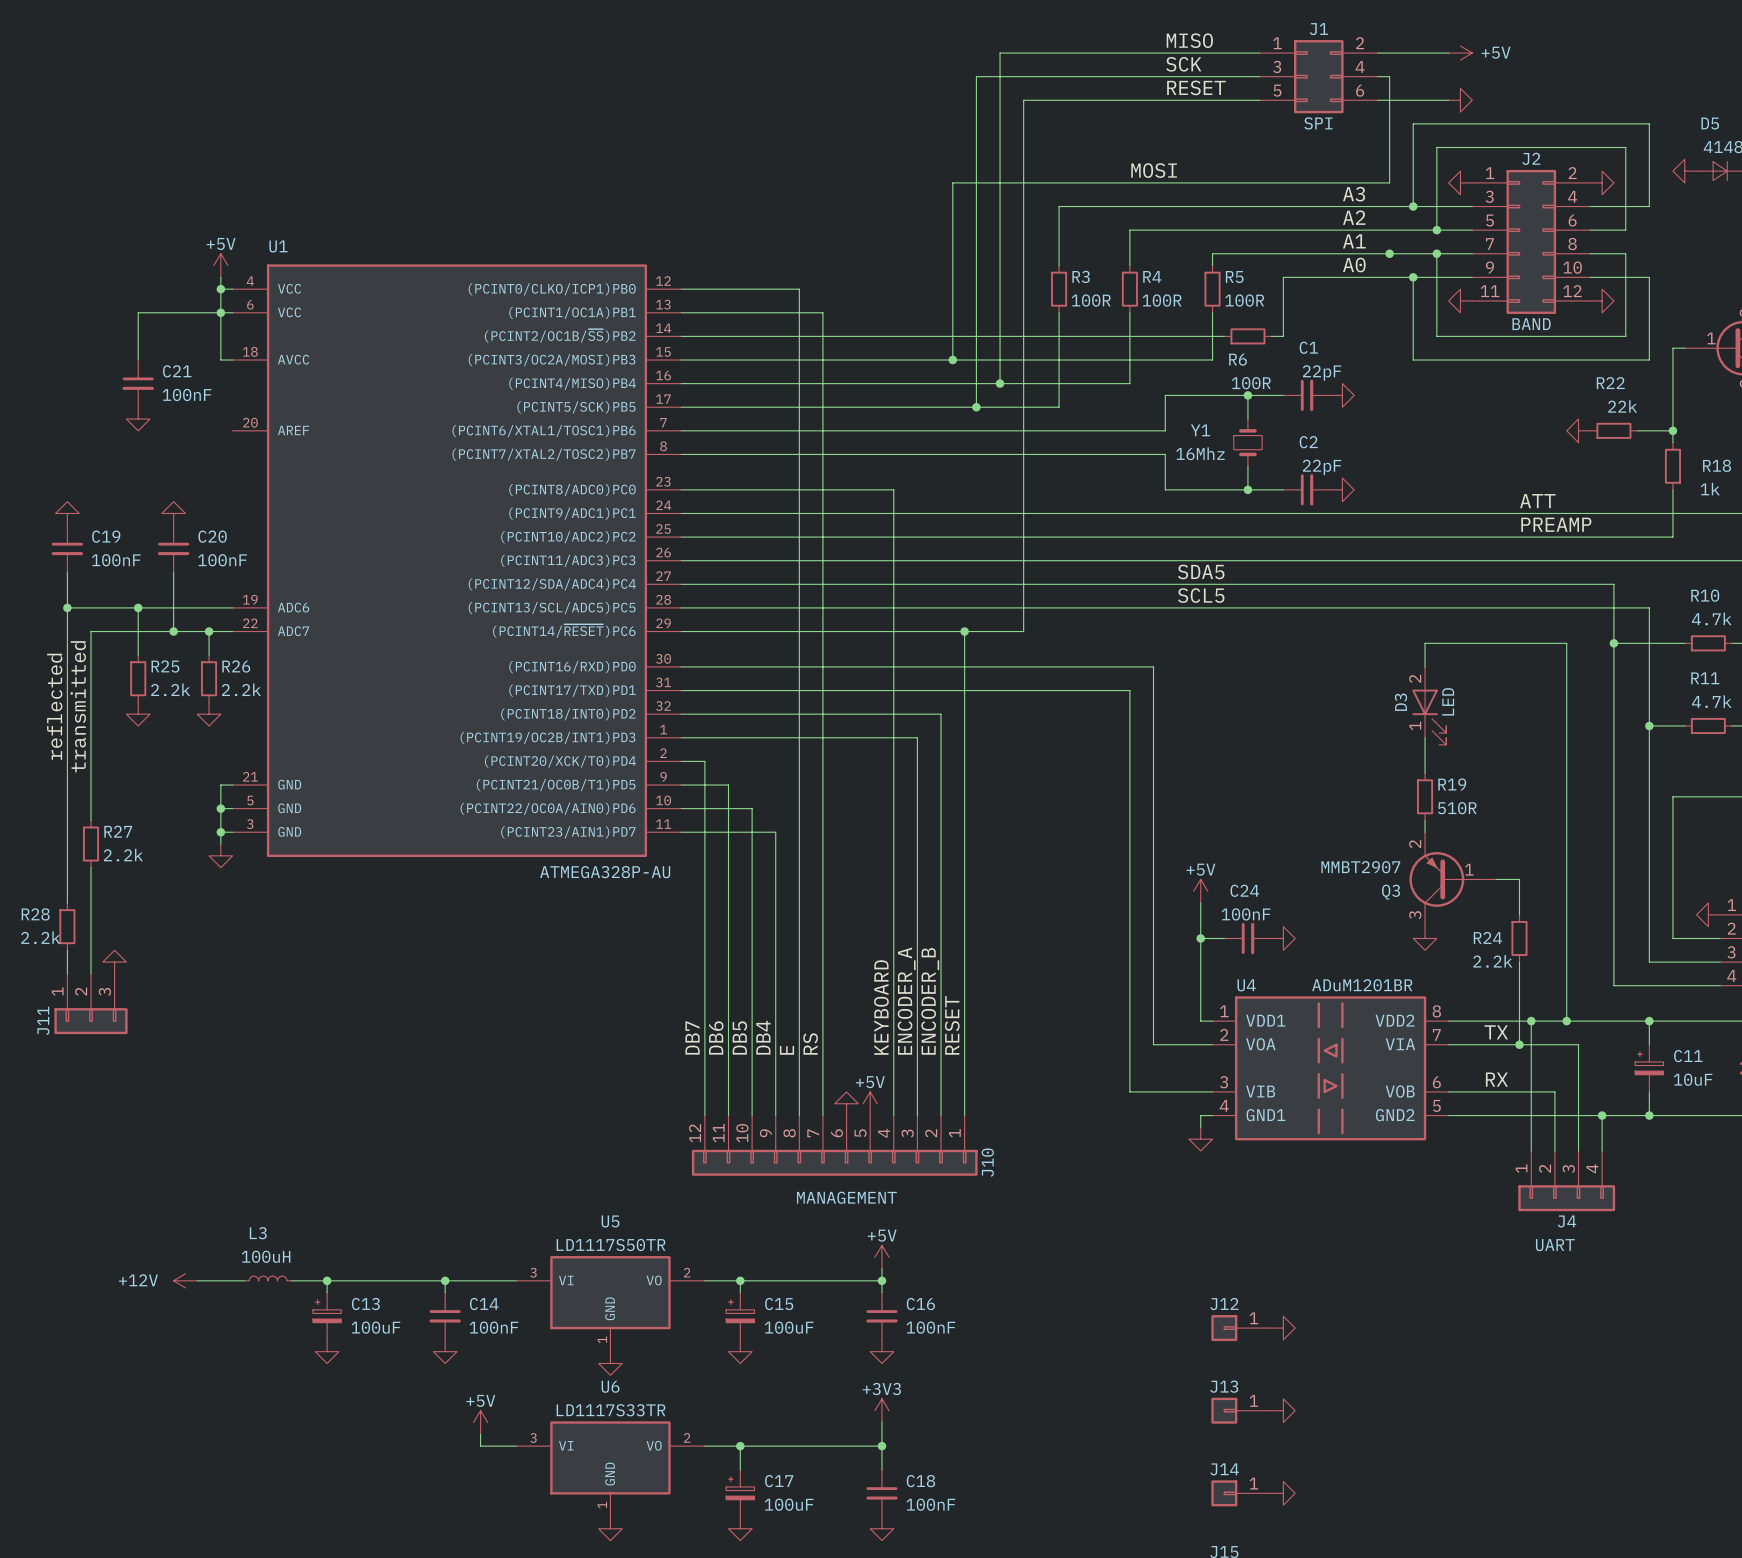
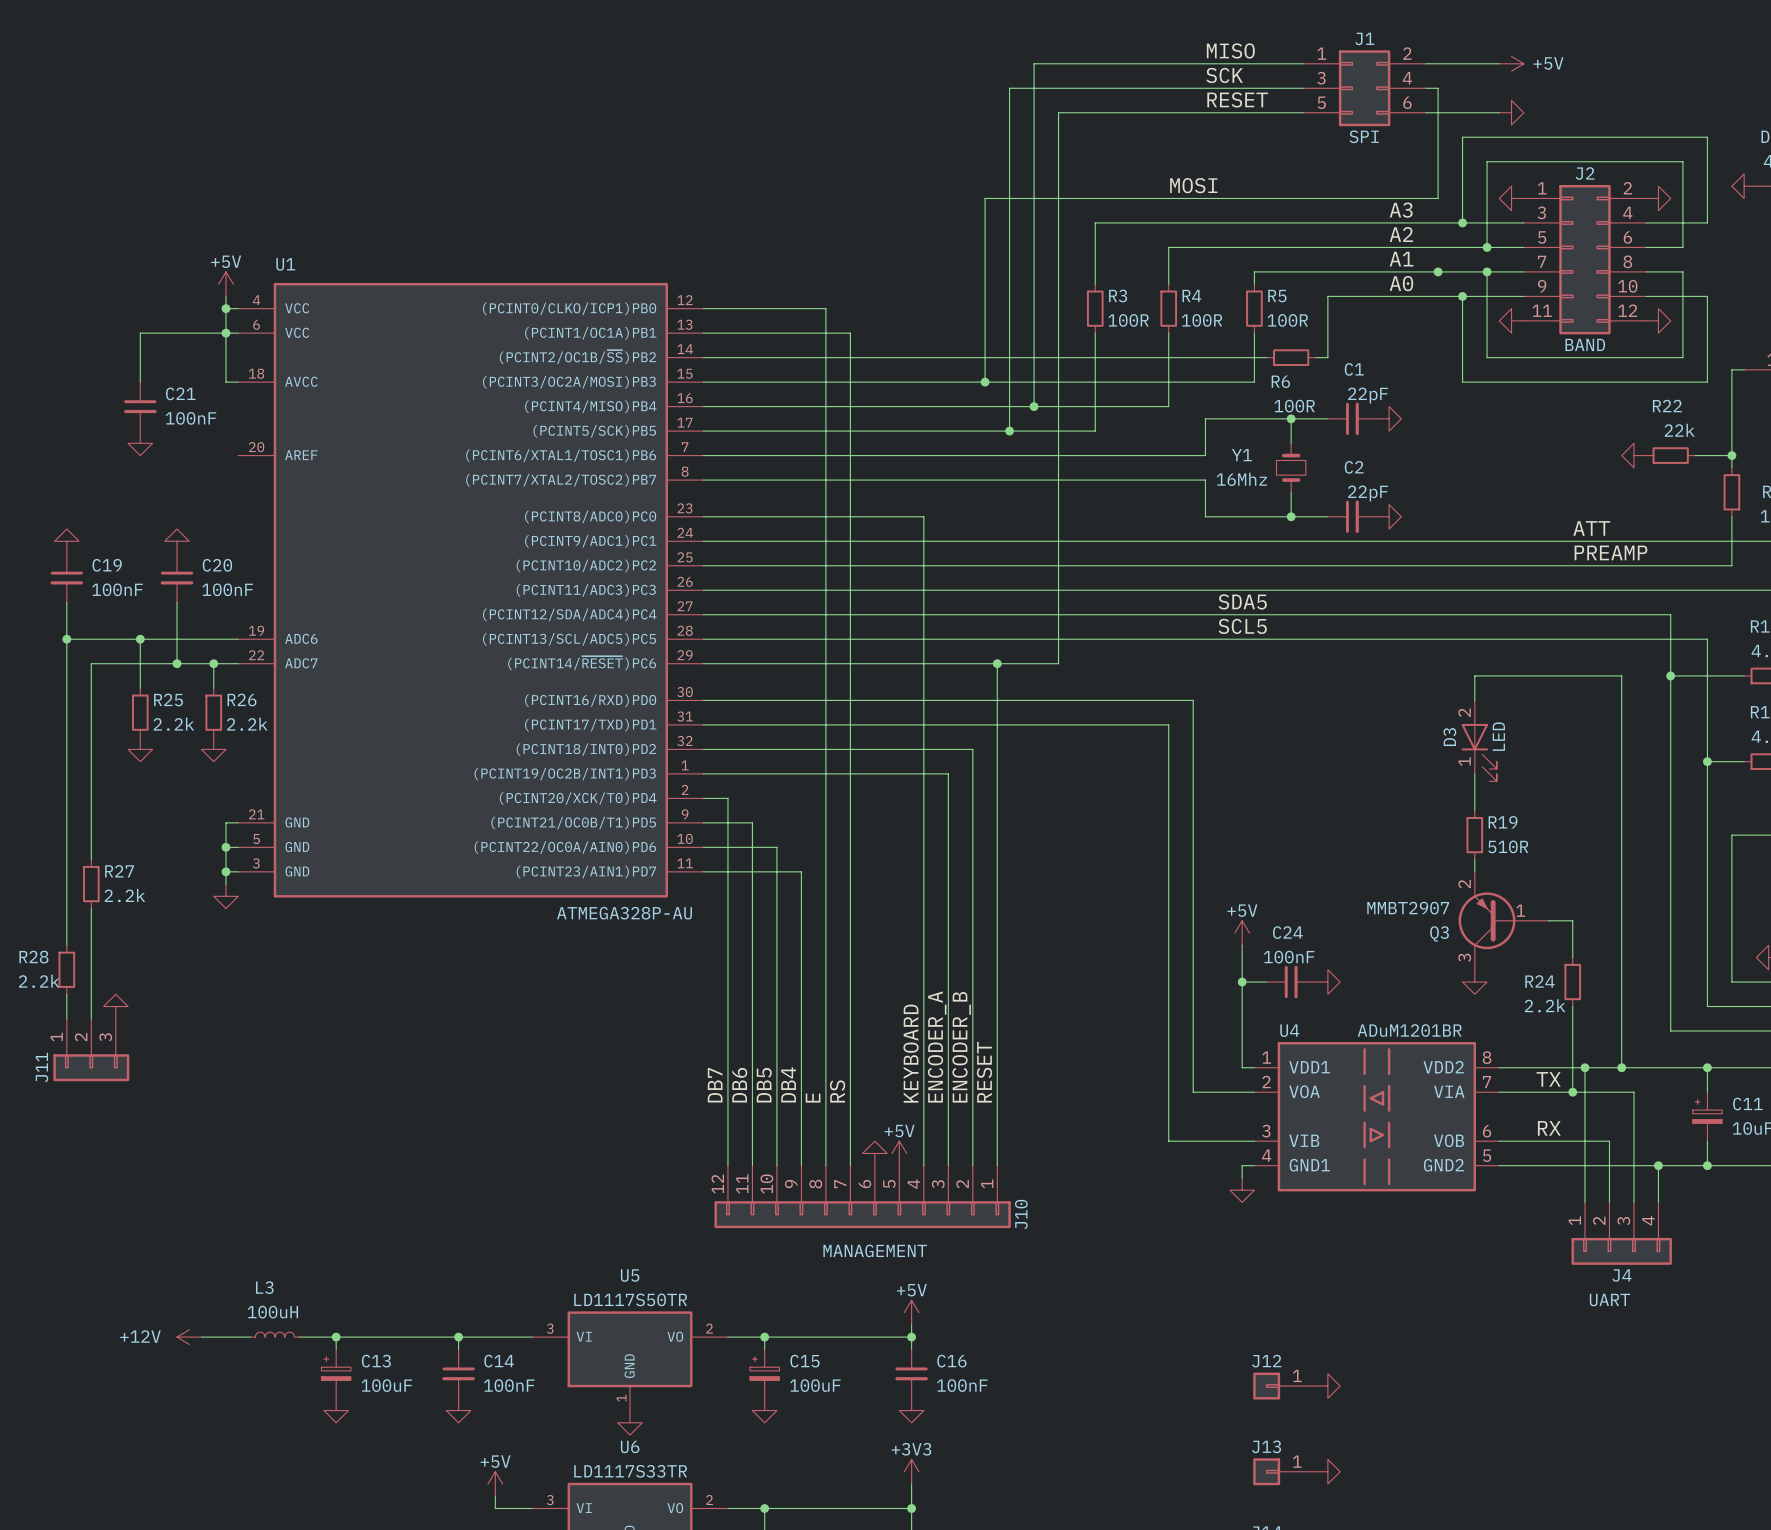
label: reflected (54, 706) -> none
label: transmitted (78, 706) -> none

